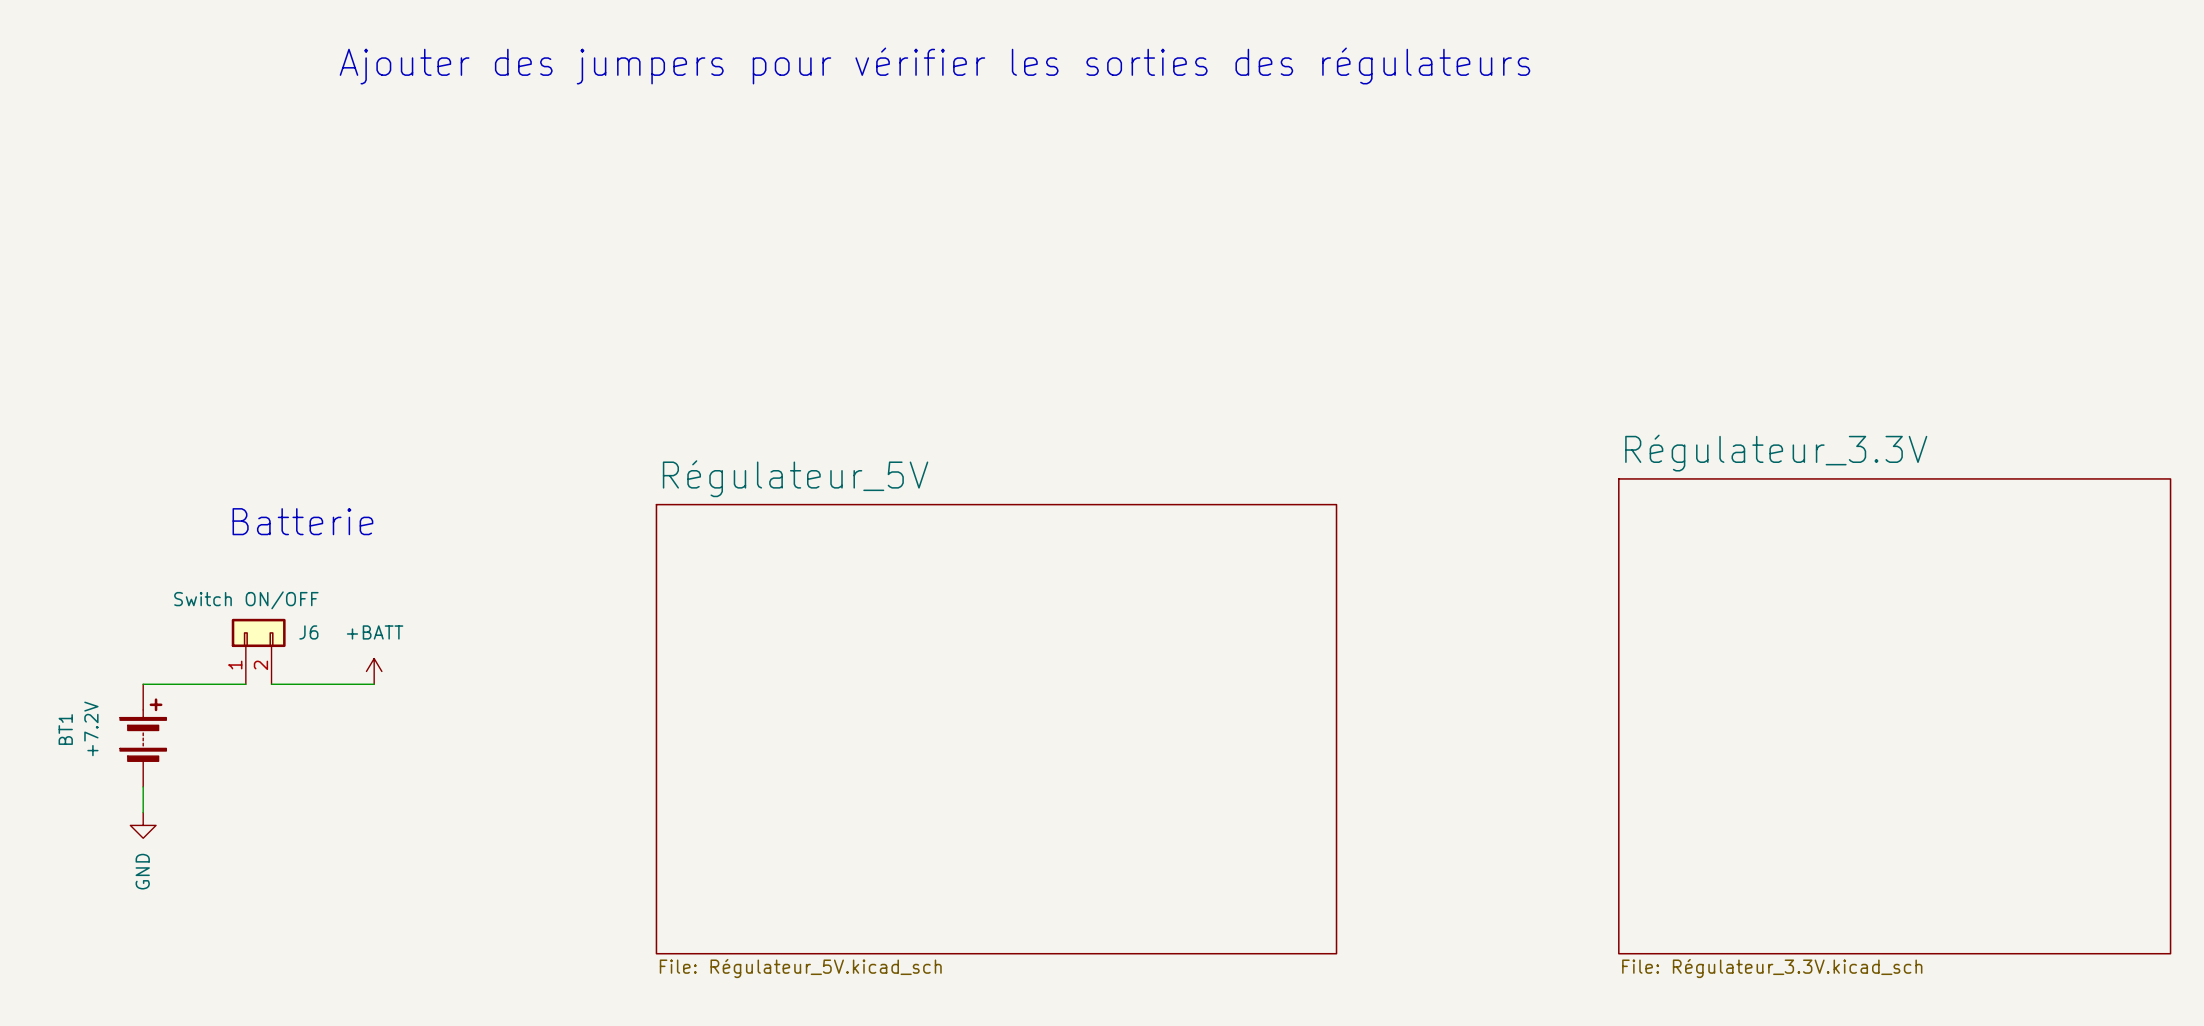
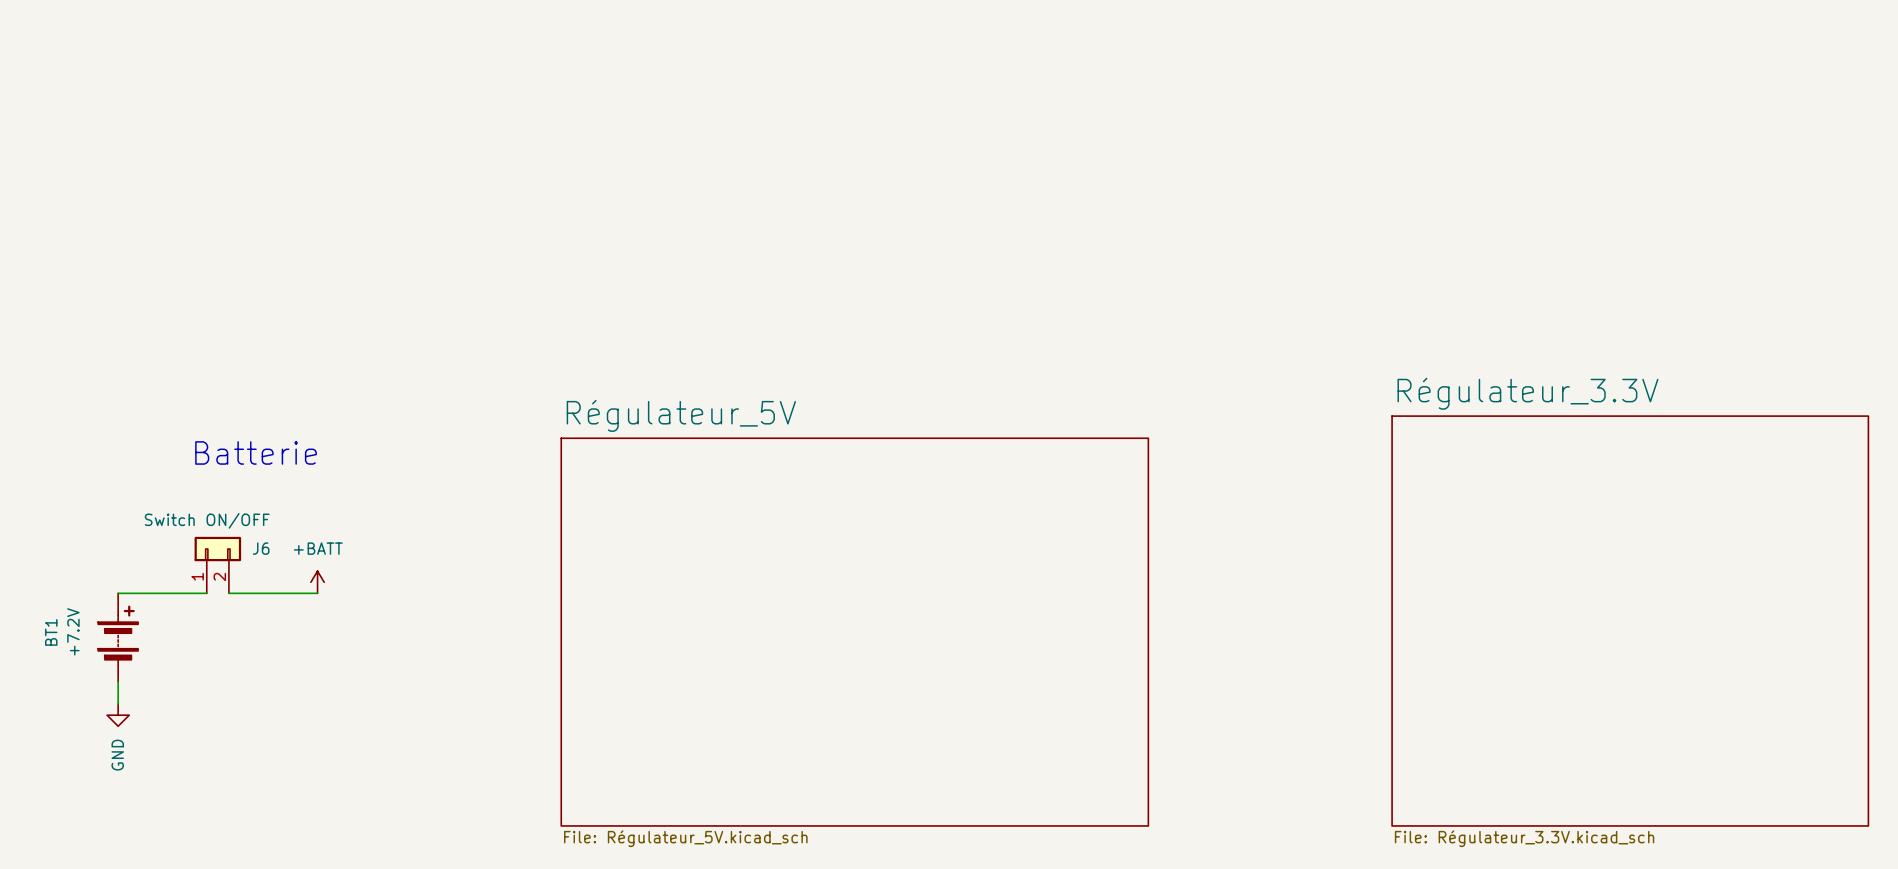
text: Ajouter des jumpers pour vérifier les sorties des régulateurs (934, 65) -> none

